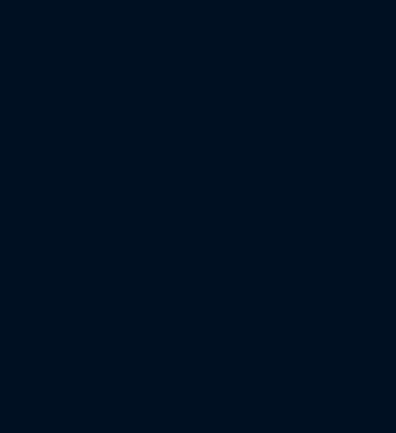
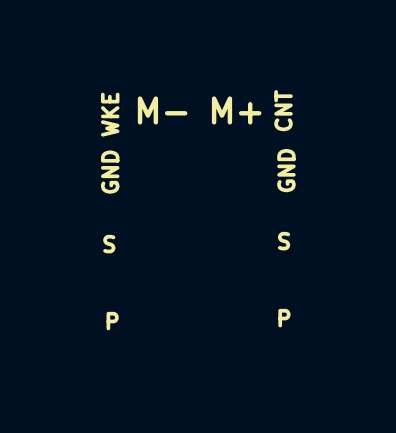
text: none -> M- (162, 110)
text: none -> M+ (236, 110)
text: none -> CNT (283, 110)
text: none -> WKE (110, 114)
text: none -> GND (286, 170)
text: none -> GND (110, 172)
text: none -> S (284, 241)
text: none -> S (109, 244)
text: none -> P (284, 318)
text: none -> P (112, 321)

